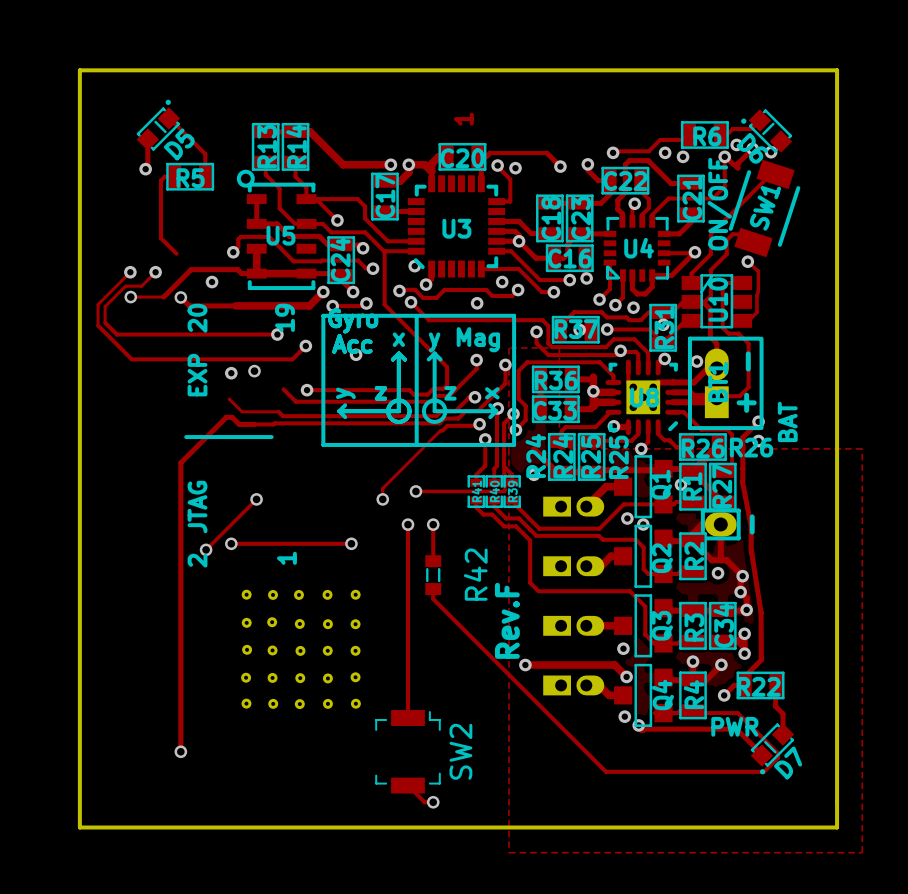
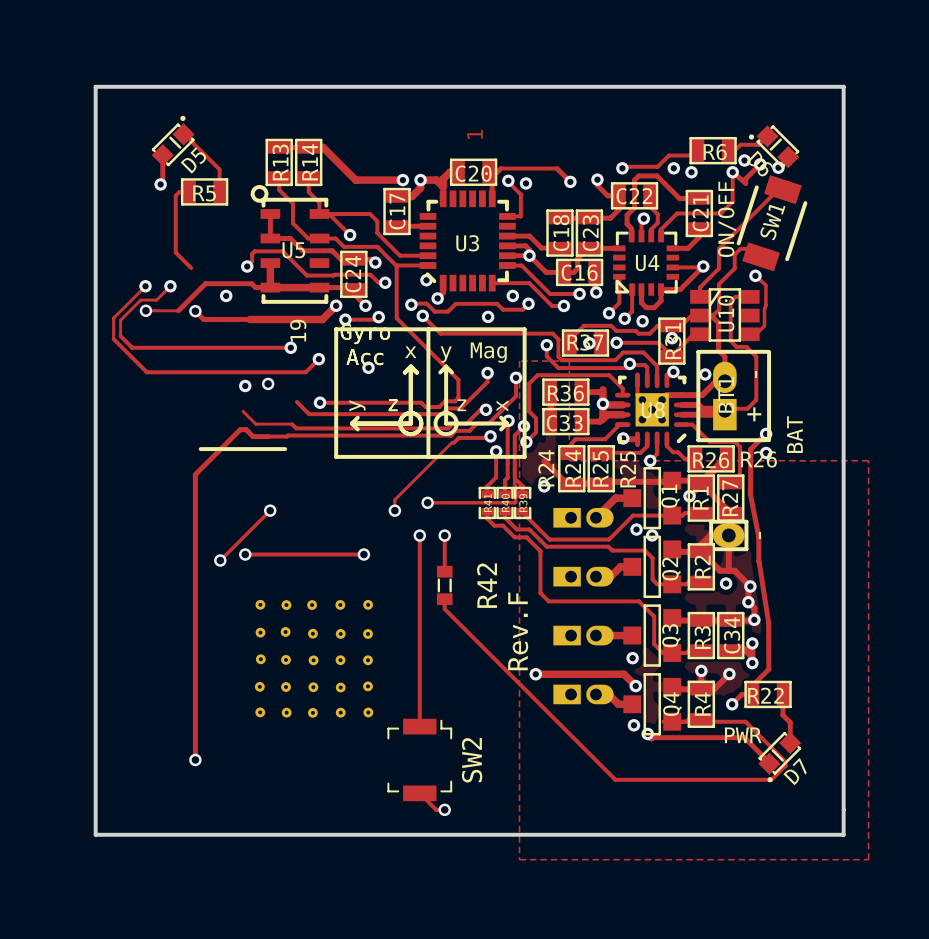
text: 20 (197, 318) -> none
text: EXP (197, 375) -> none
text: JTAG (197, 506) -> none
text: 1 (286, 558) -> none
text: 2 (197, 560) -> none

